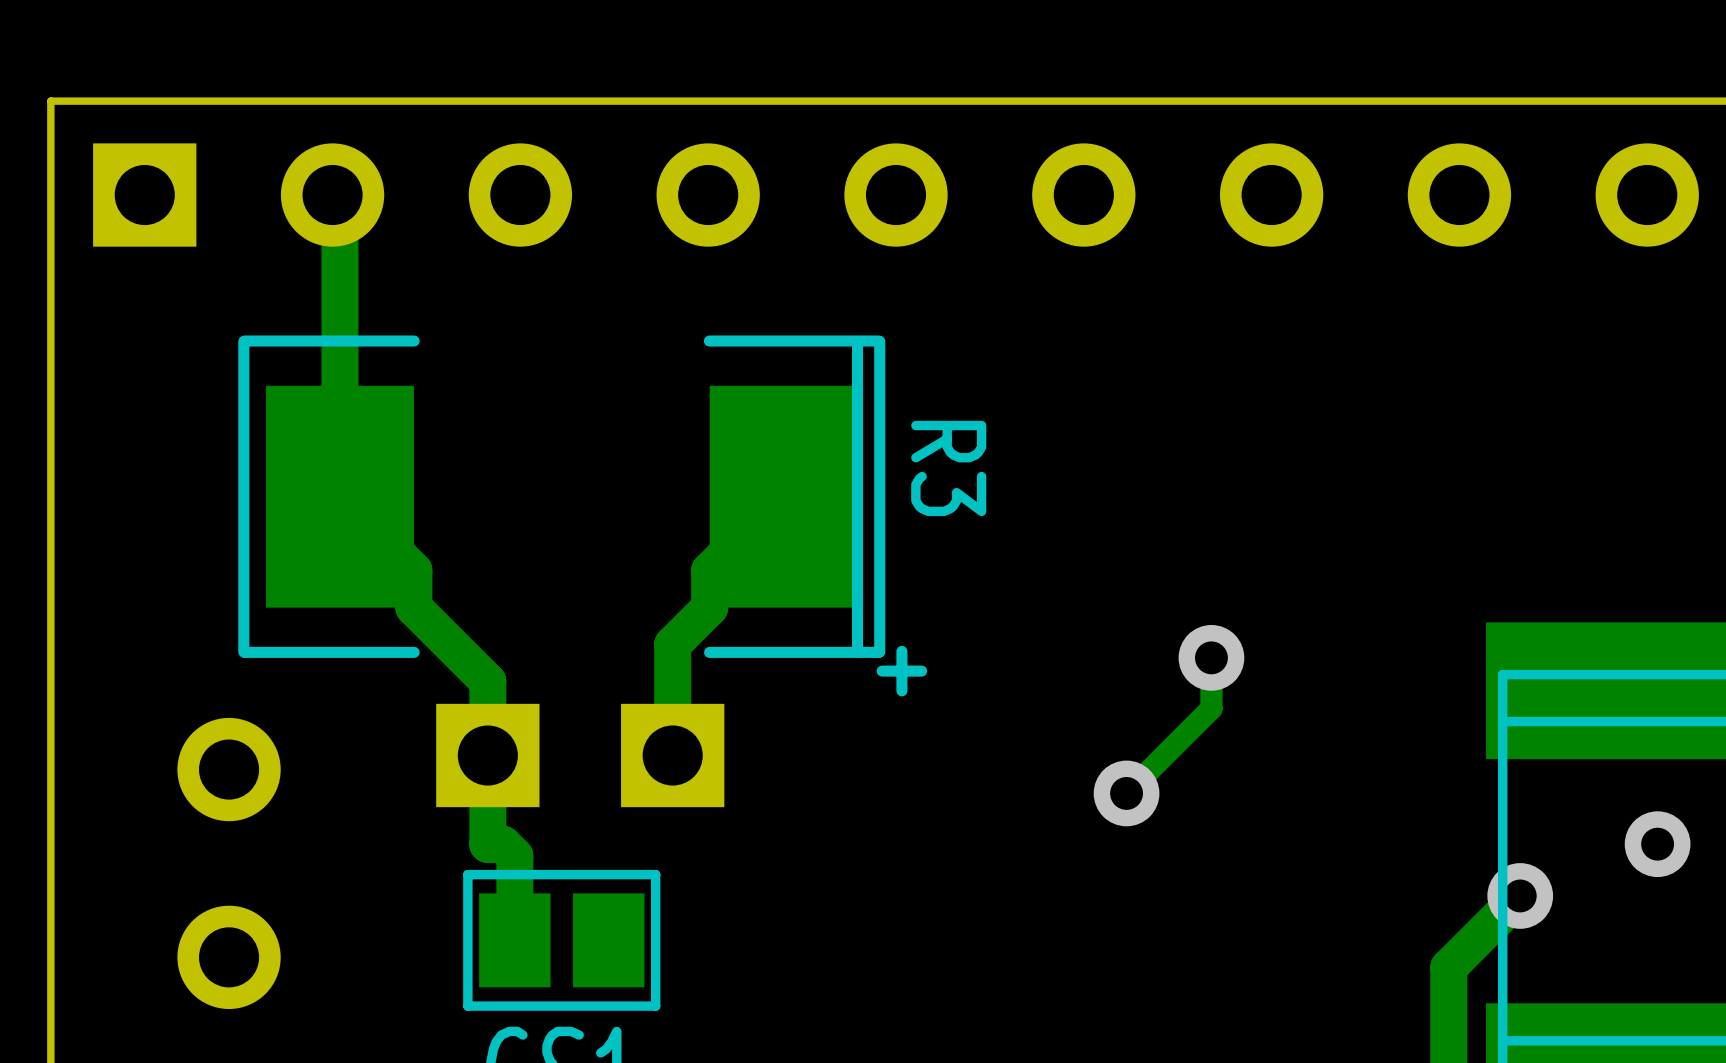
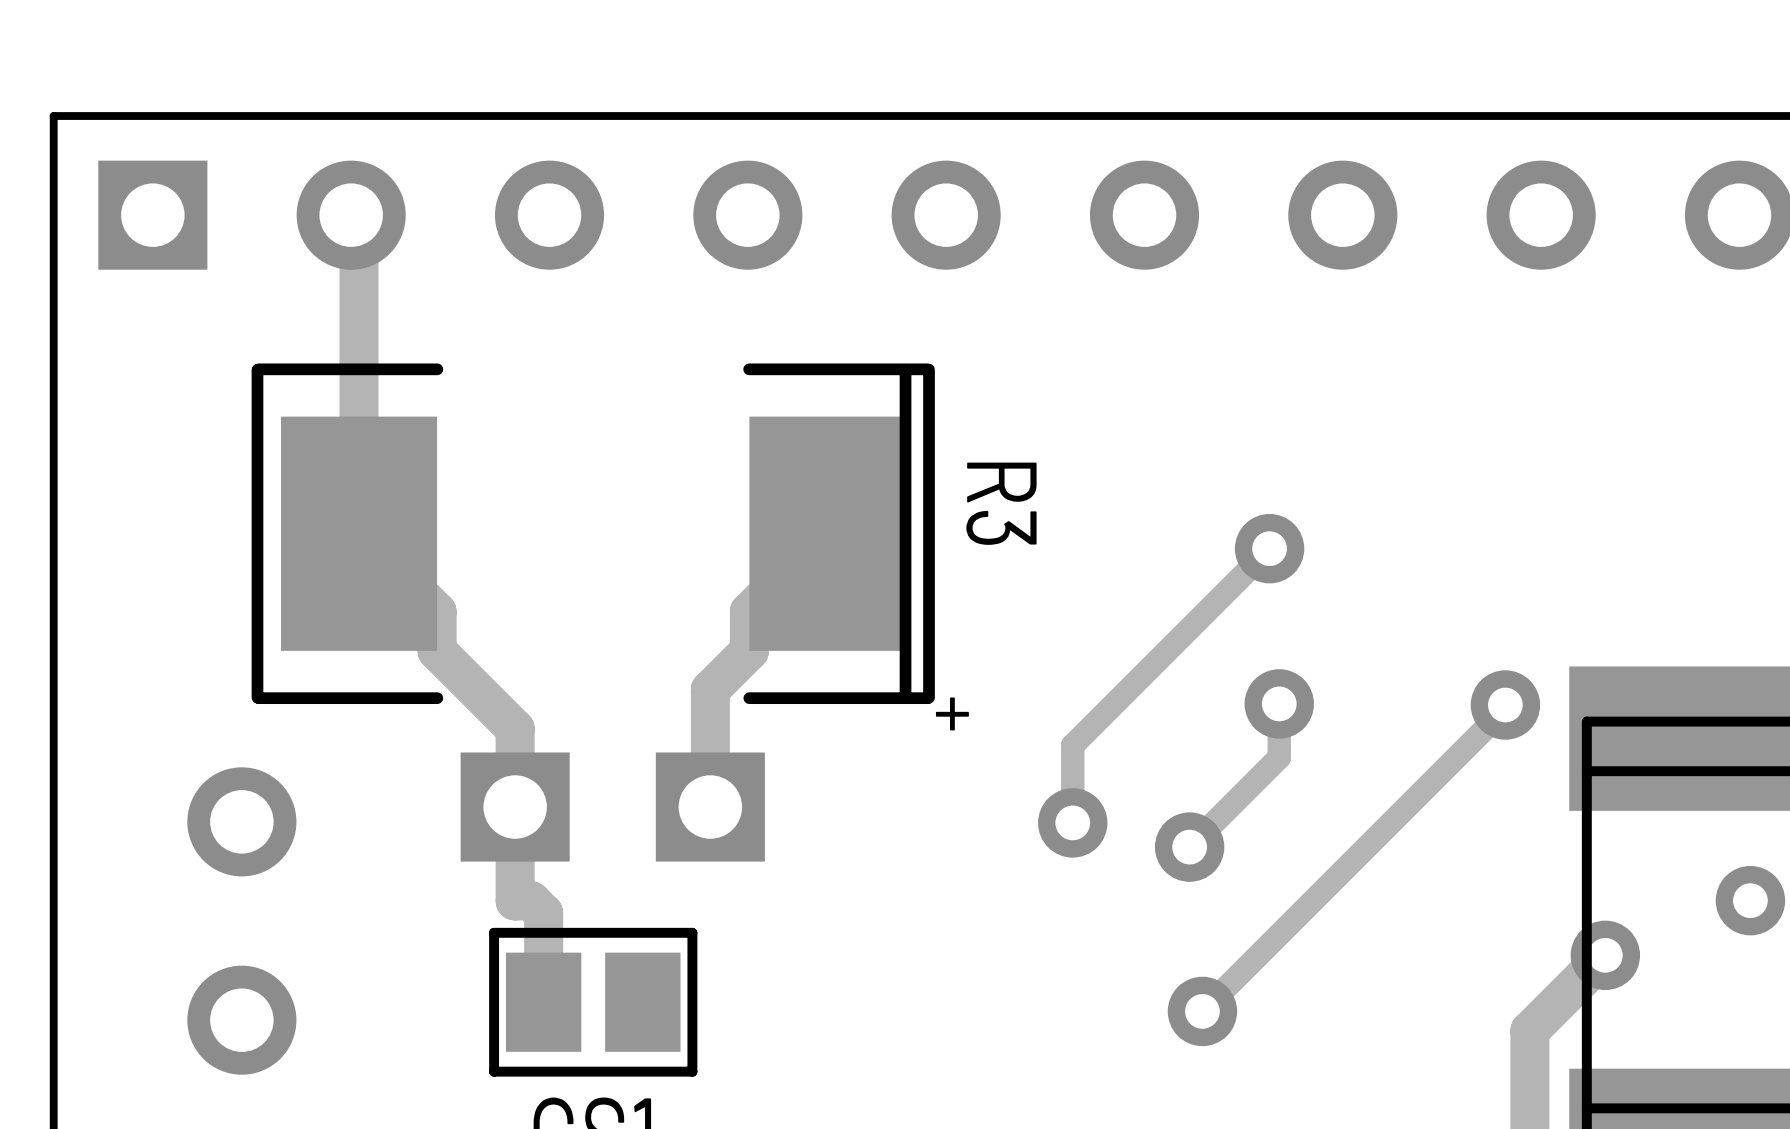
track: none -> (1269, 548) (1072, 745) (1072, 822)
via: none -> (1269, 548)
track: none -> (1505, 705) (1505, 708) (1202, 1011)
via: none -> (1505, 705)
via: none -> (1072, 822)
via: none -> (1202, 1011)

